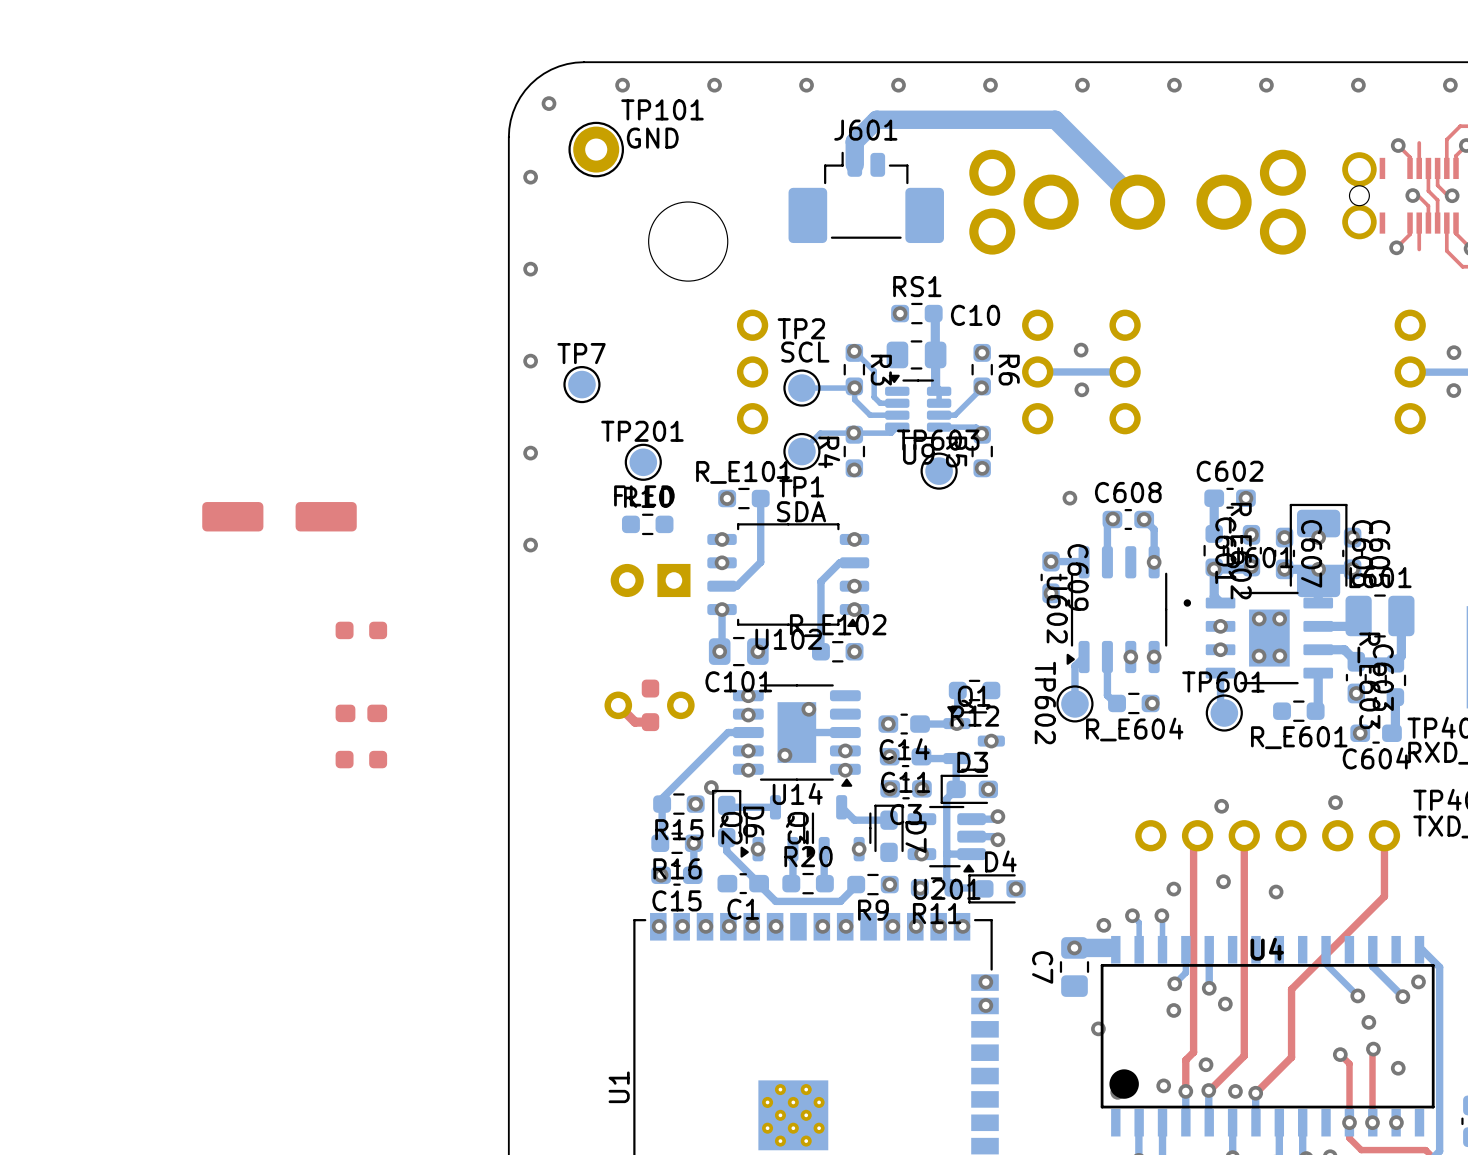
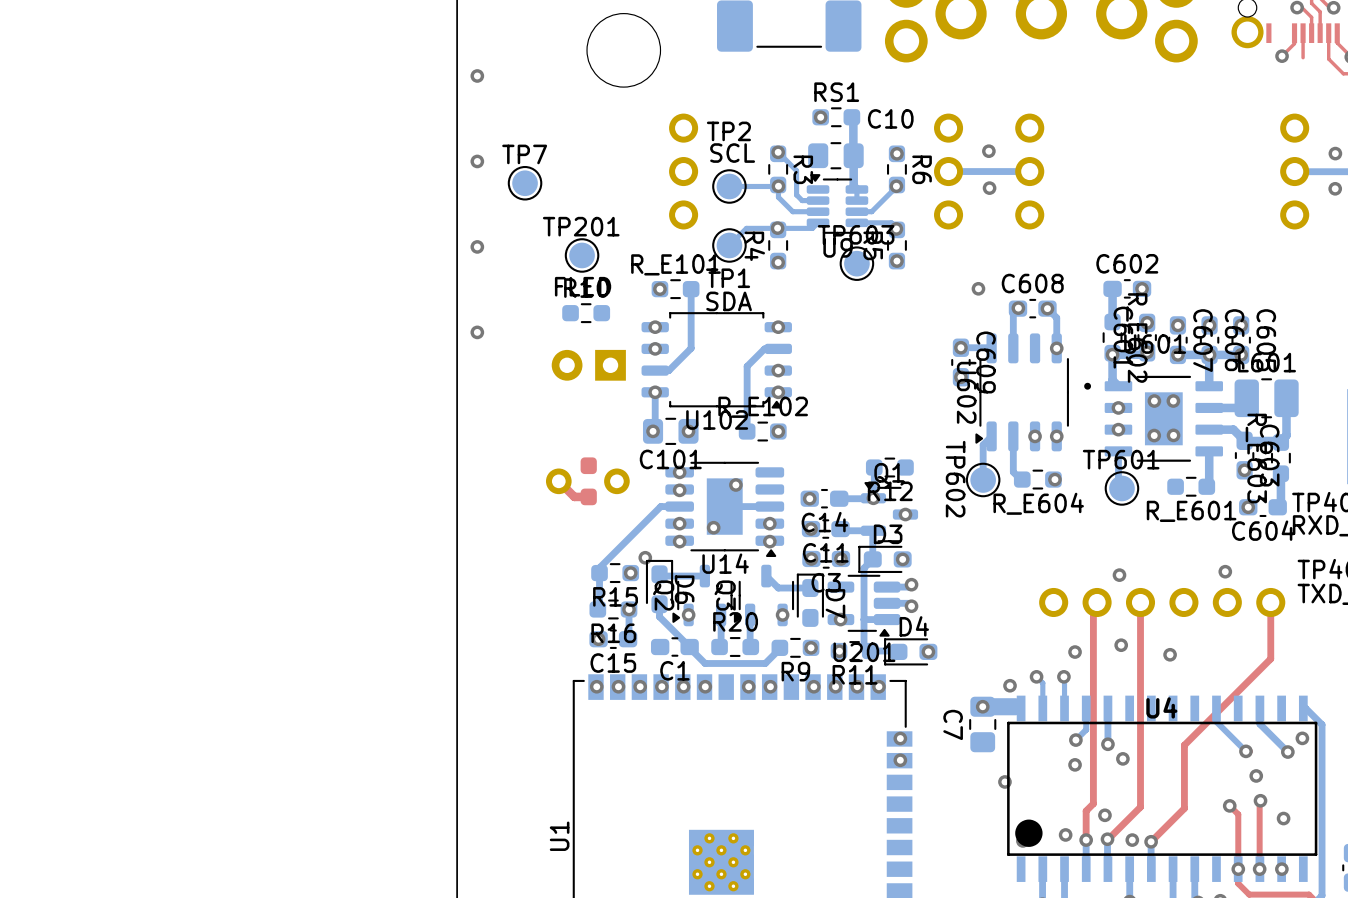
C606 footprint: [1289, 503, 1348, 598] -> [1199, 316, 1220, 365]
part: (279, 516) -> none
part: (361, 630) -> none
part: (361, 713) -> none
part: (361, 759) -> none

